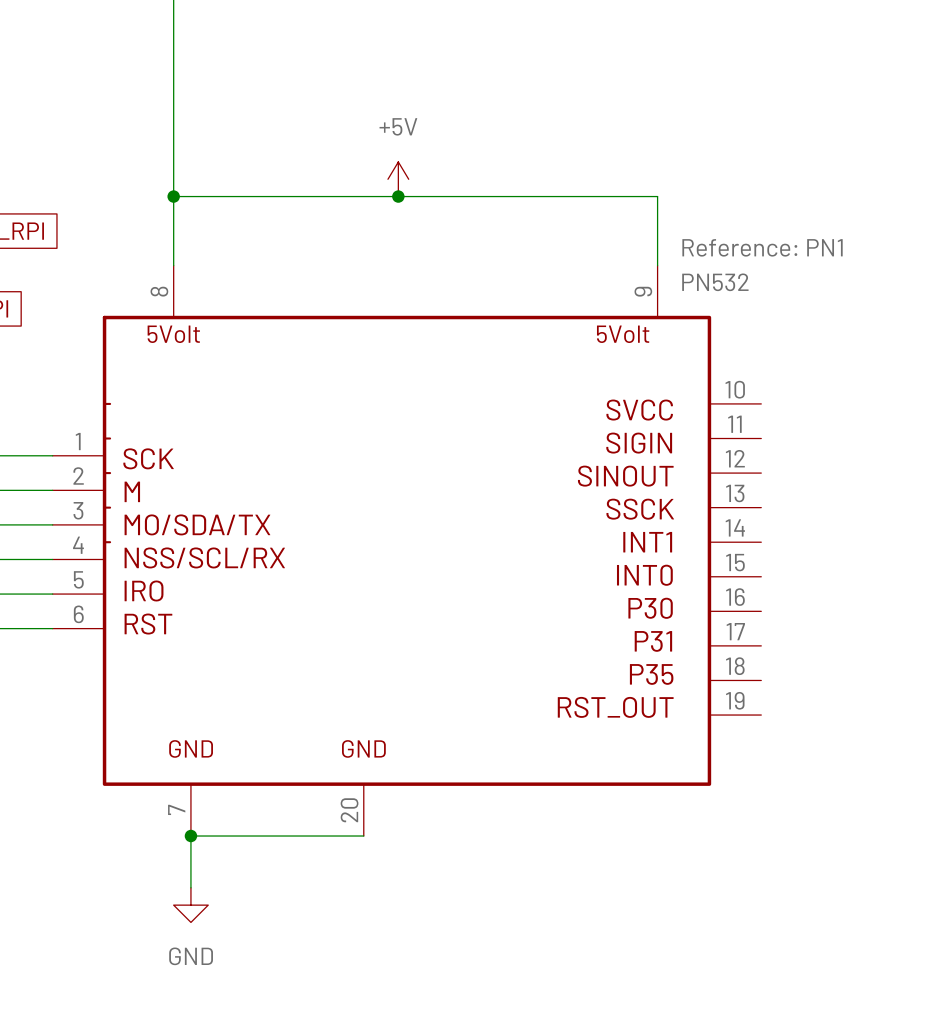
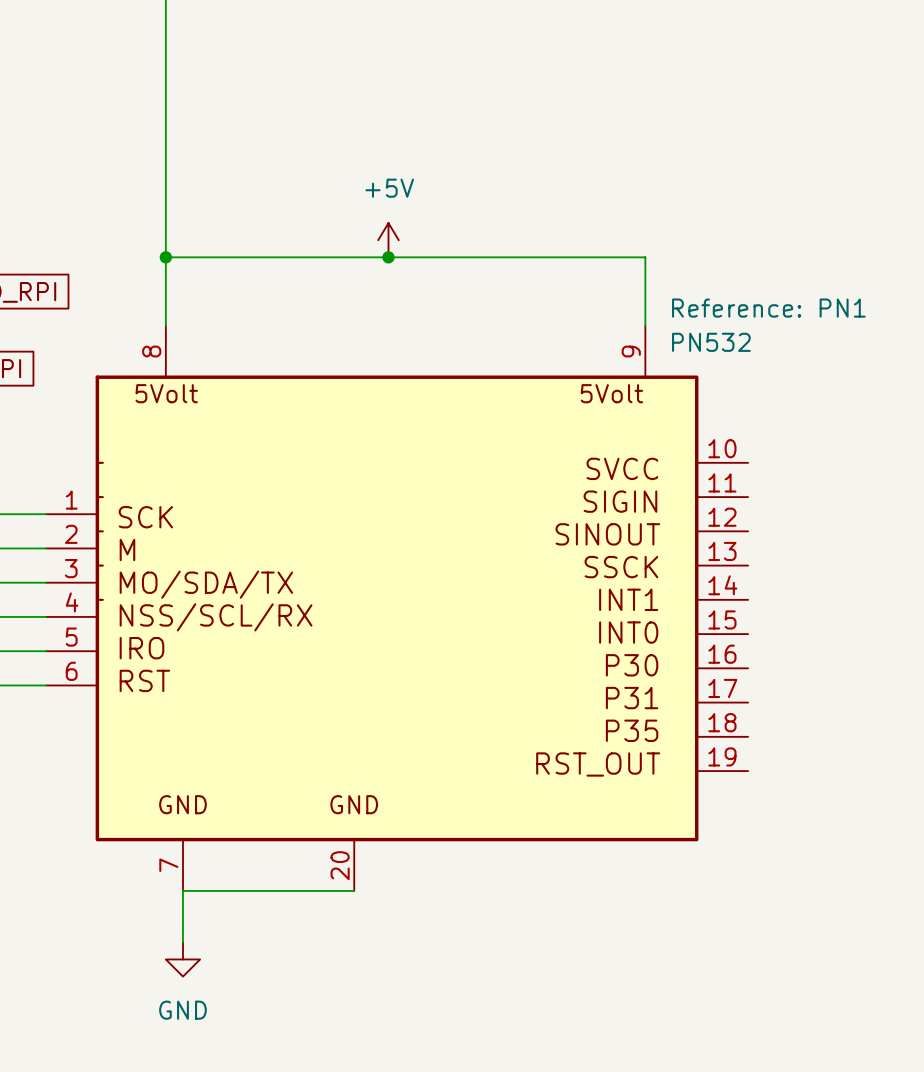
junction: (190, 836) -> none

